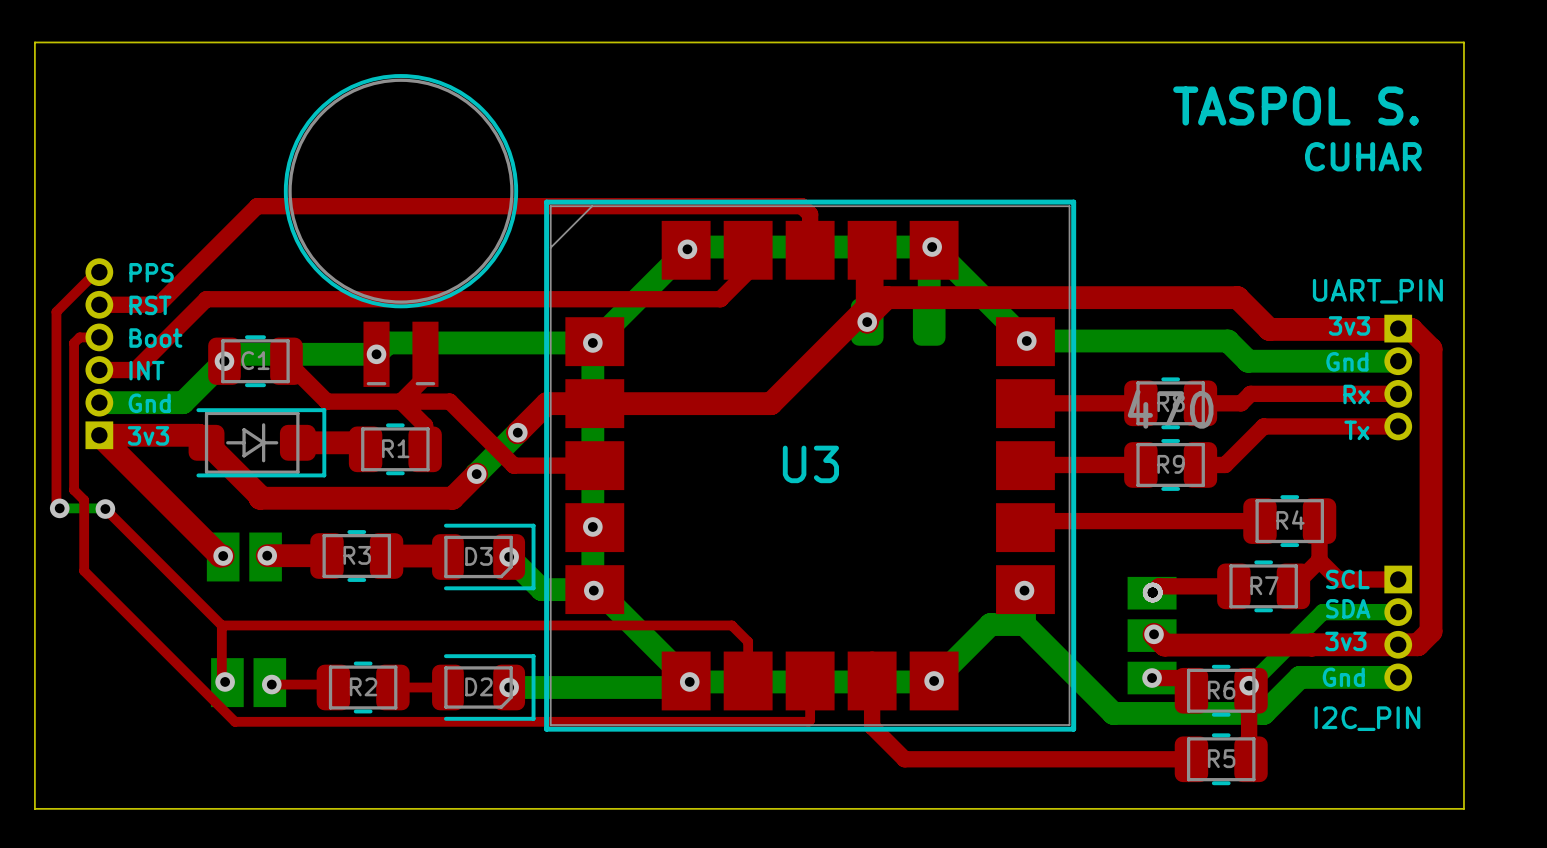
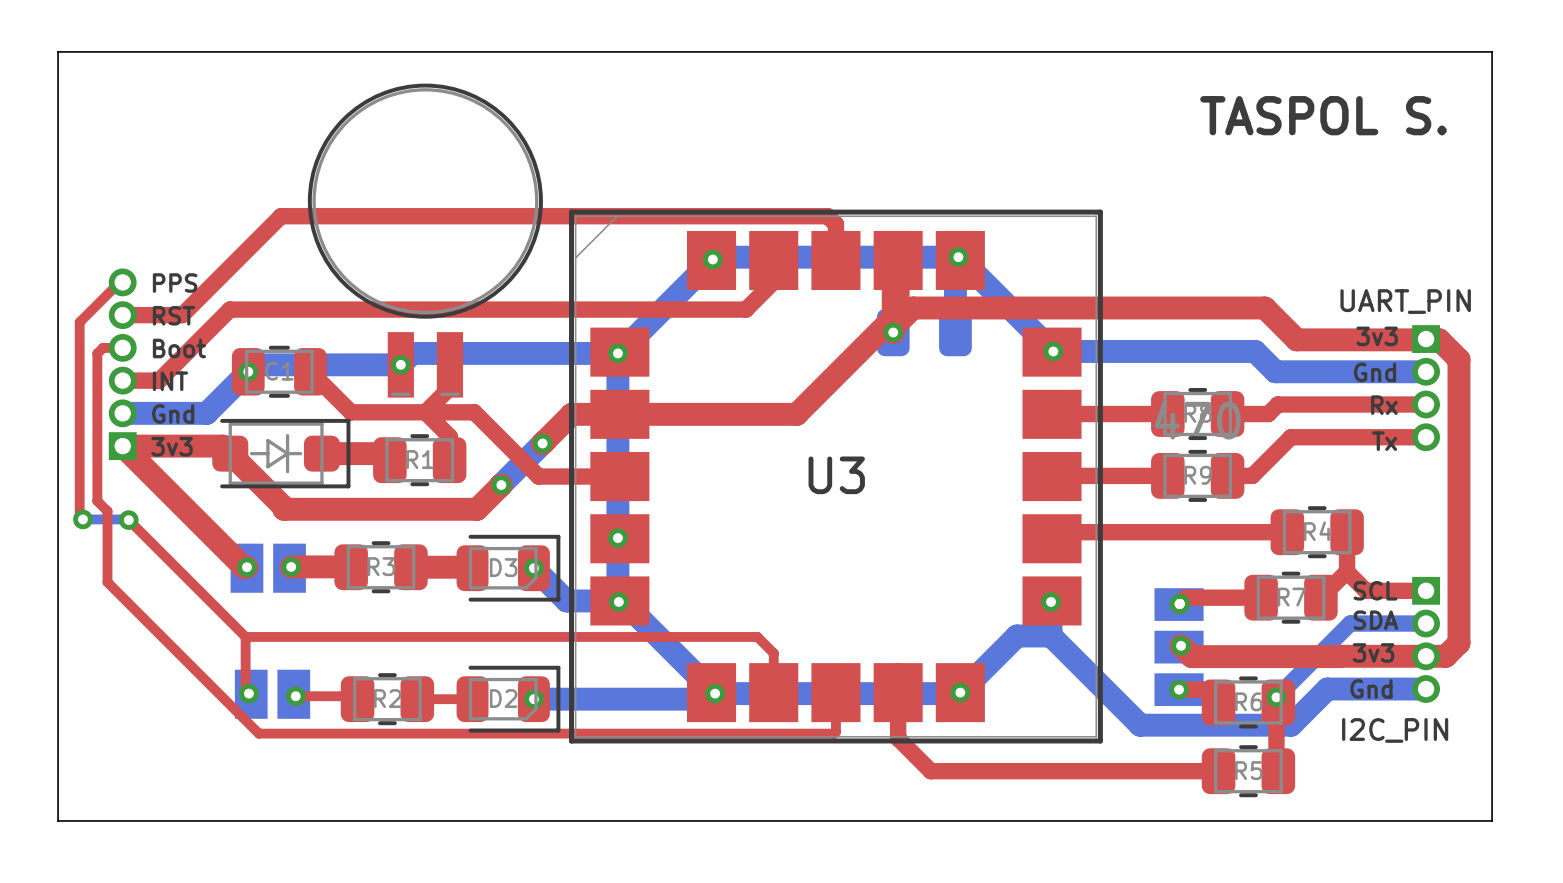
text: CUHAR (1363, 156) -> none

